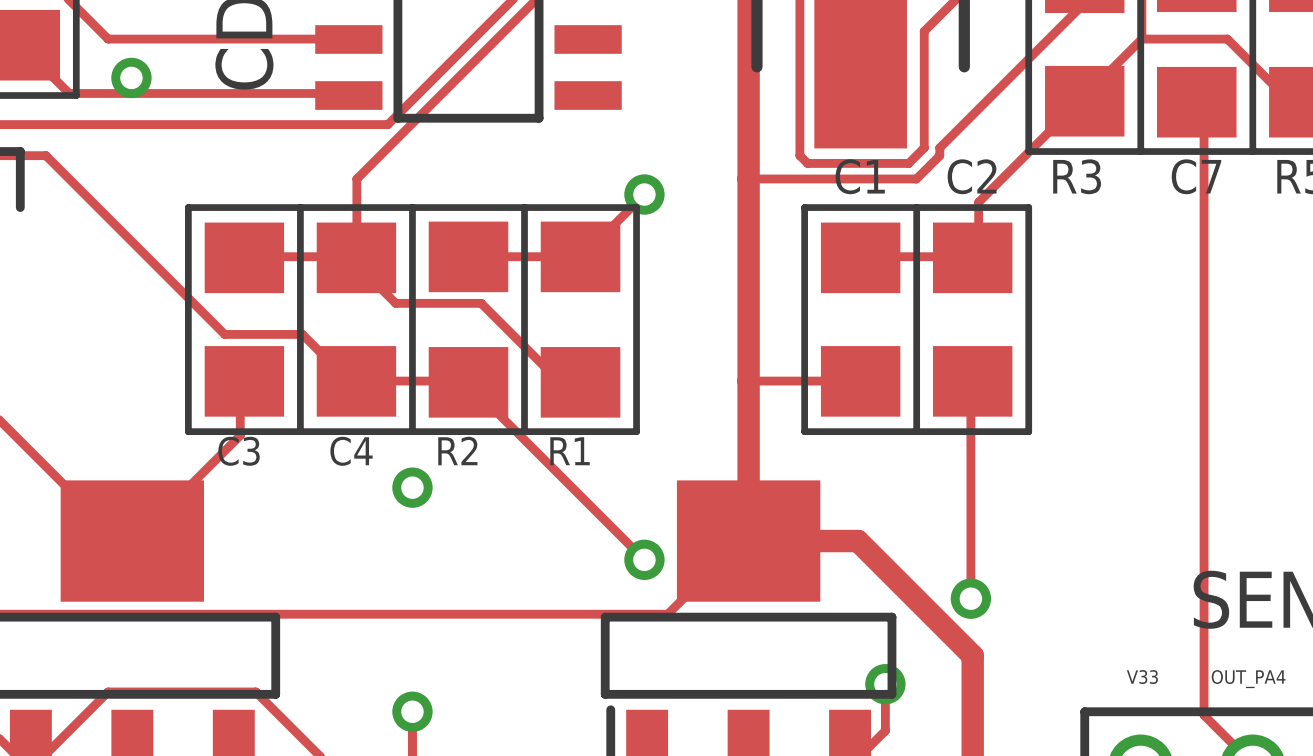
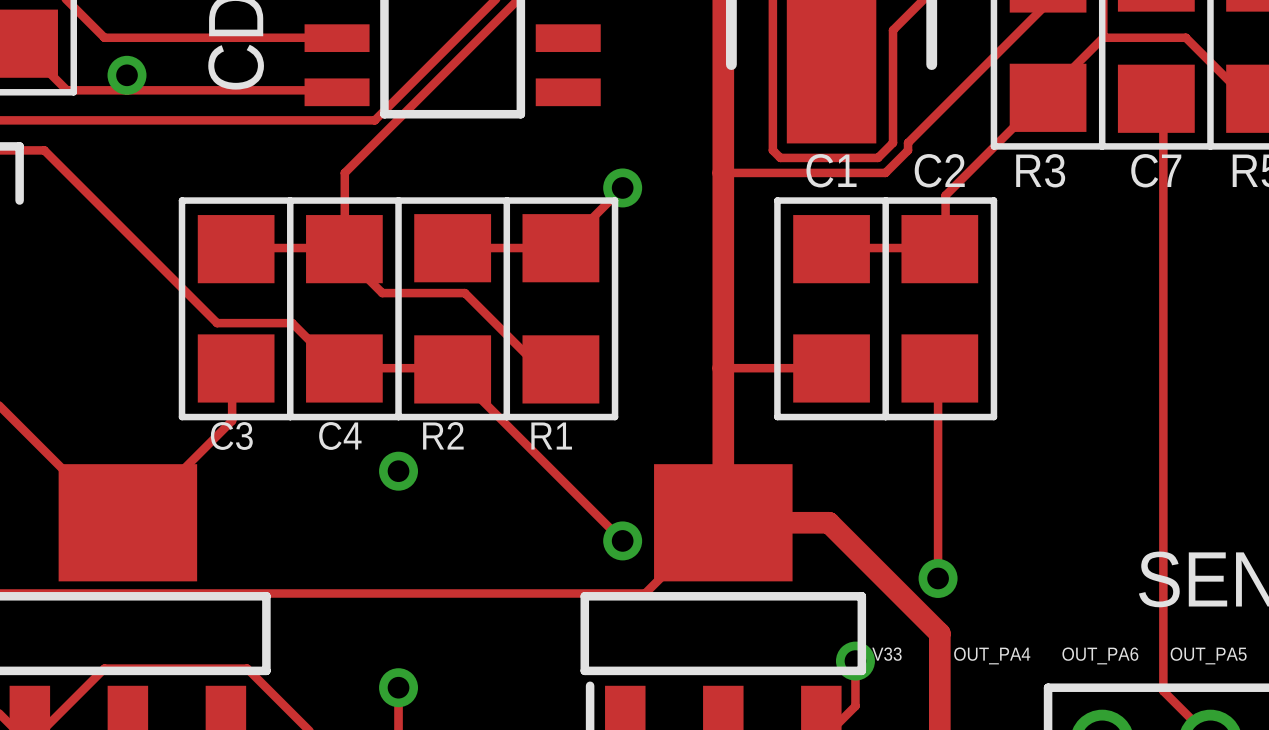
text: none -> V33 (886, 654)
text: V33 (1142, 677) -> OUT_PA6 (1100, 655)
text: none -> OUT_PA4 (992, 655)
text: OUT_PA4 (1248, 679) -> OUT_PA5 (1208, 655)

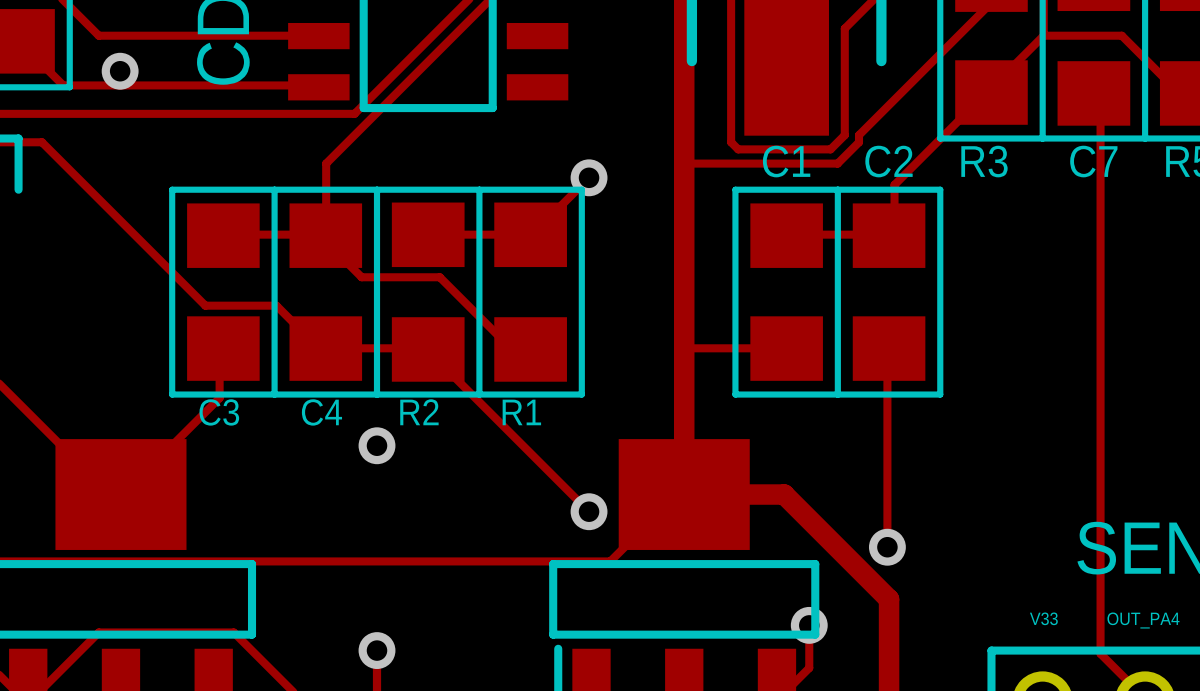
text: V33 (886, 654) -> none
text: OUT_PA4 (992, 655) -> none
text: OUT_PA6 (1100, 655) -> V33 (1043, 618)
text: OUT_PA5 (1208, 655) -> OUT_PA4 (1143, 620)

